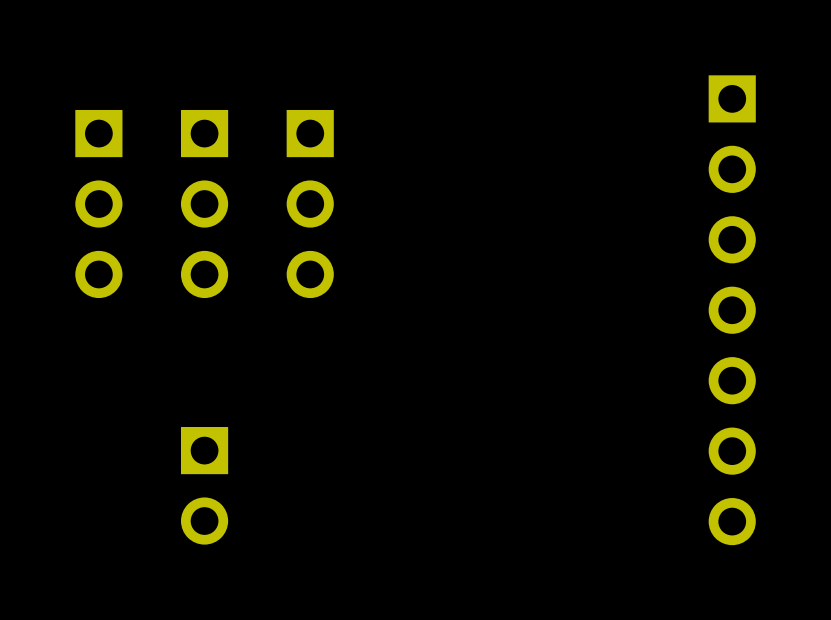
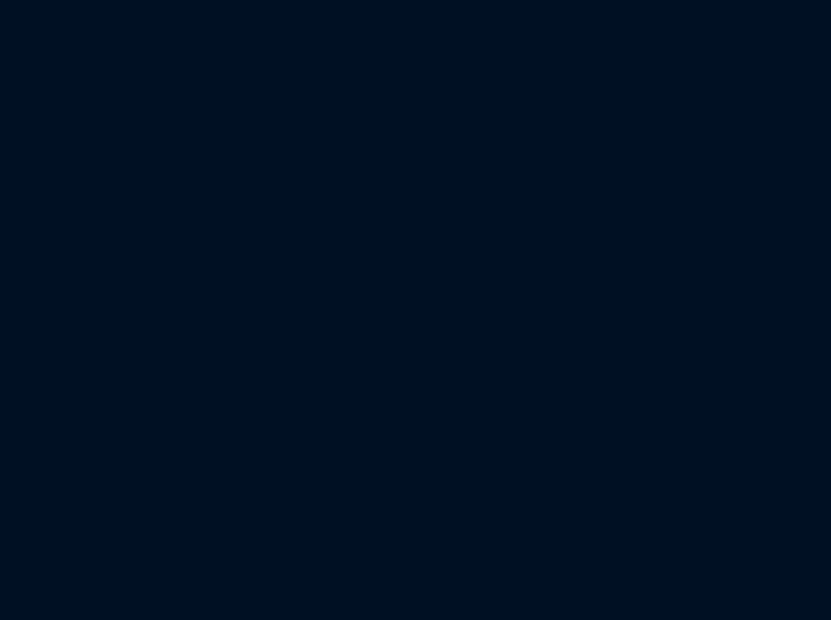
part: (98, 204) -> none
part: (204, 204) -> none
part: (310, 204) -> none
part: (732, 310) -> none
part: (204, 485) -> none

